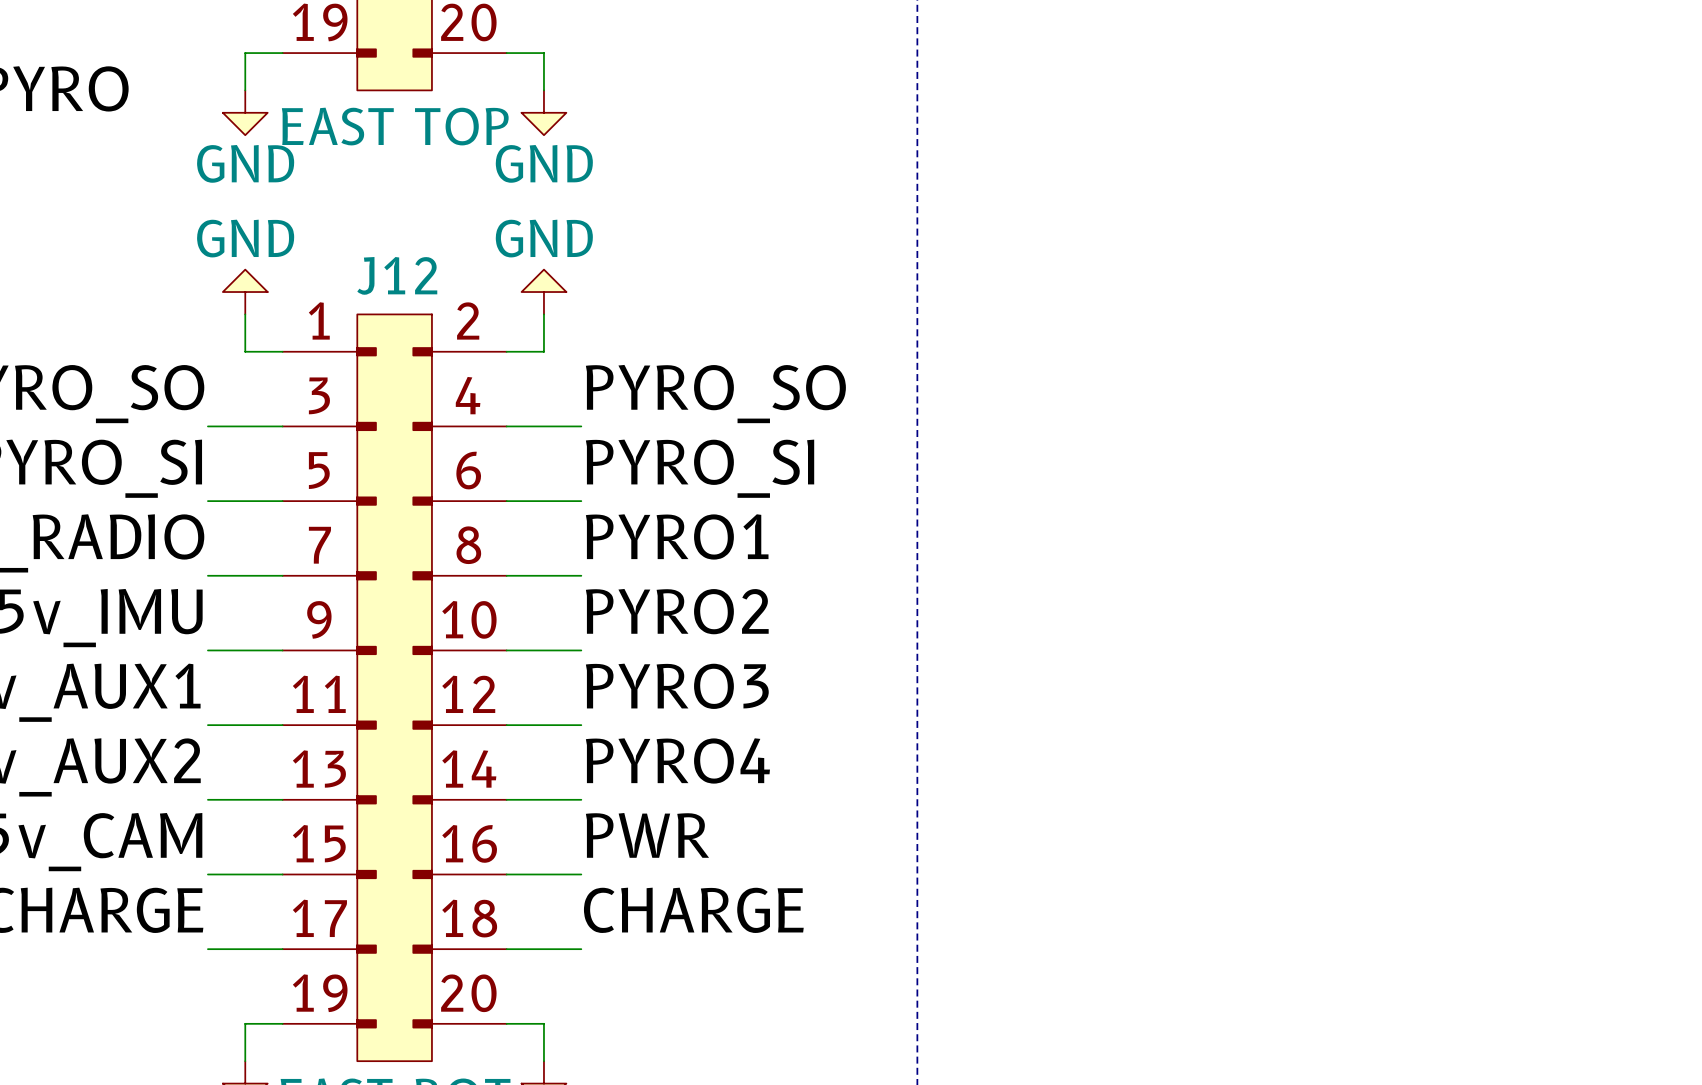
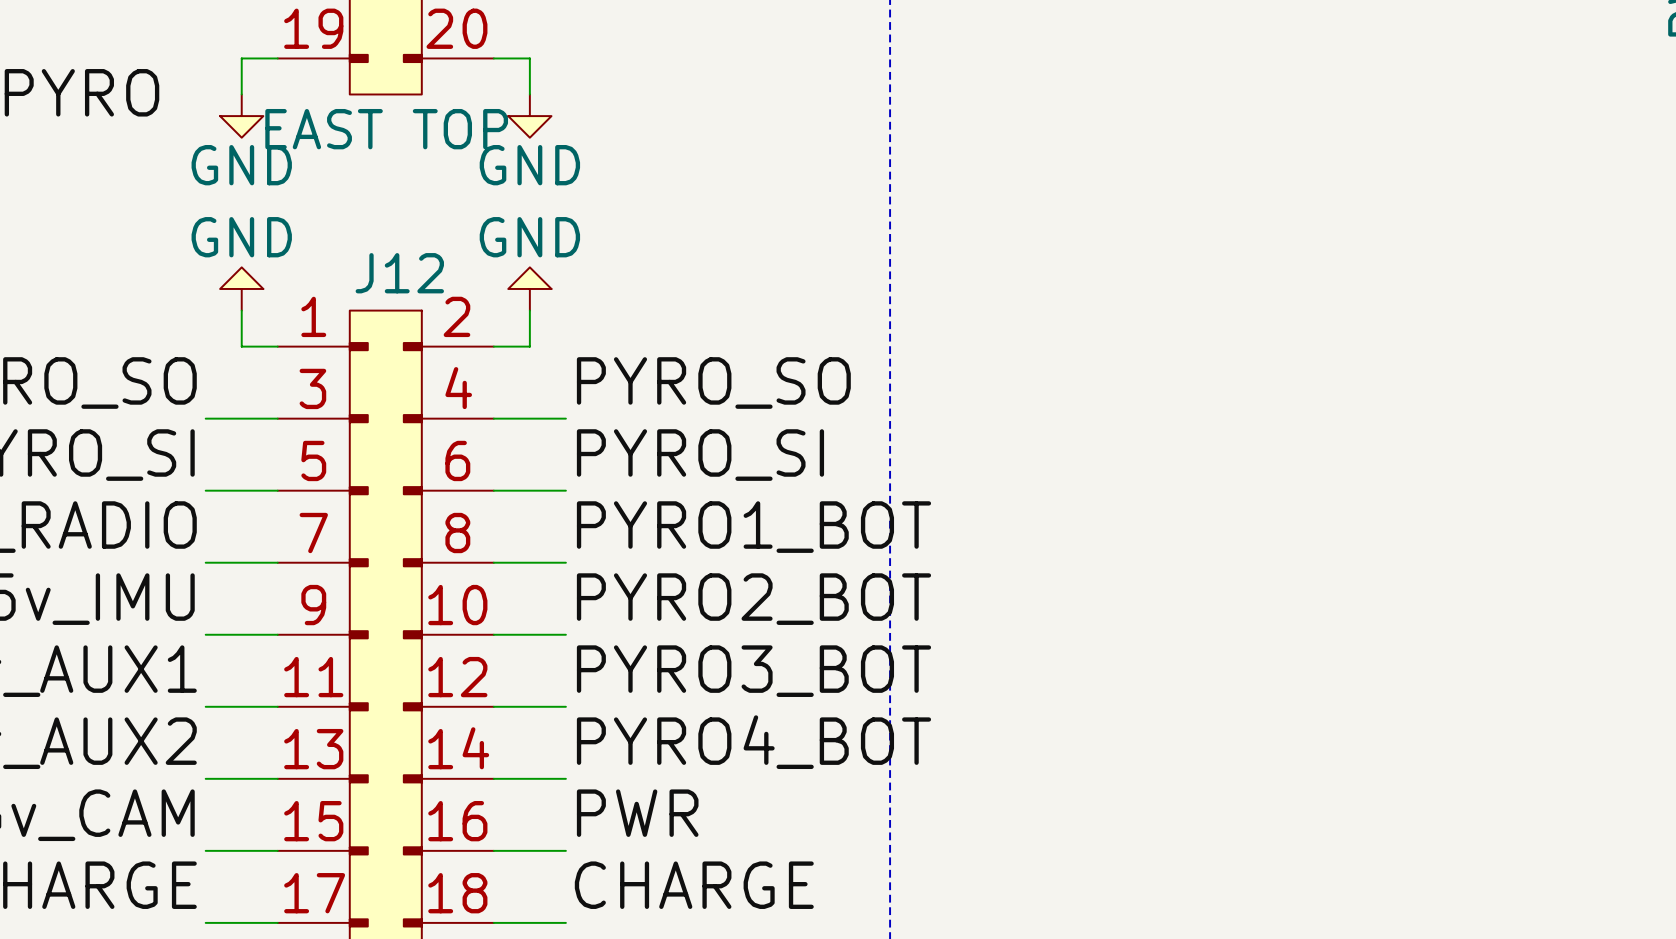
label: PYRO1 (677, 536) -> PYRO1_BOT (753, 527)
label: PYRO2 (677, 611) -> PYRO2_BOT (753, 599)
label: PYRO3 (677, 686) -> PYRO3_BOT (753, 671)
label: PYRO4 (677, 760) -> PYRO4_BOT (753, 742)

